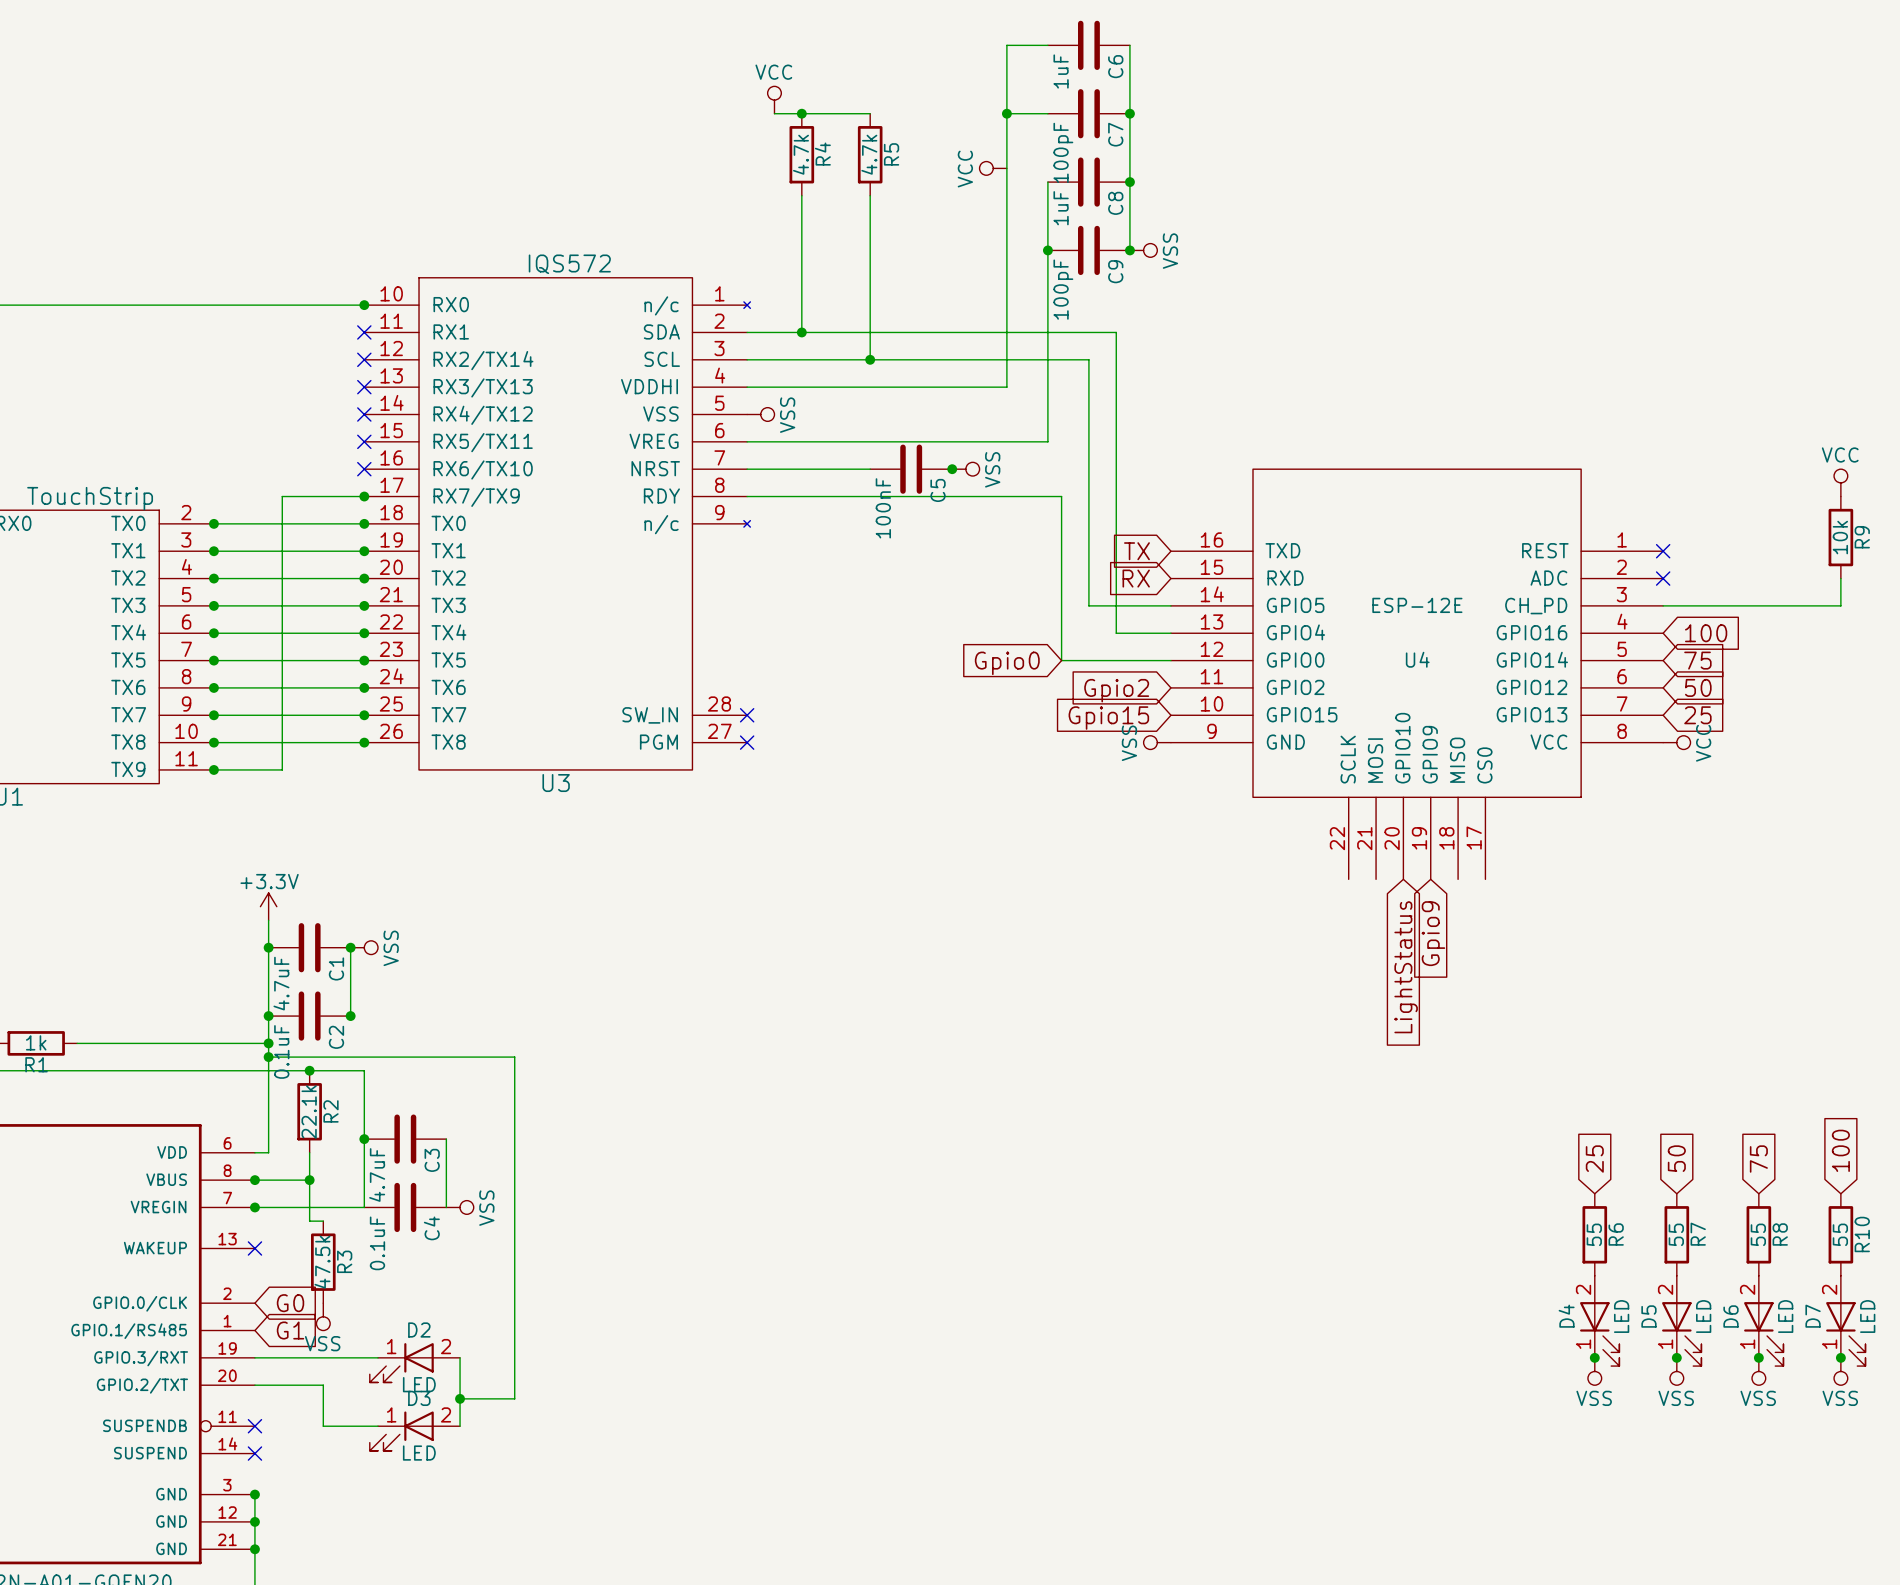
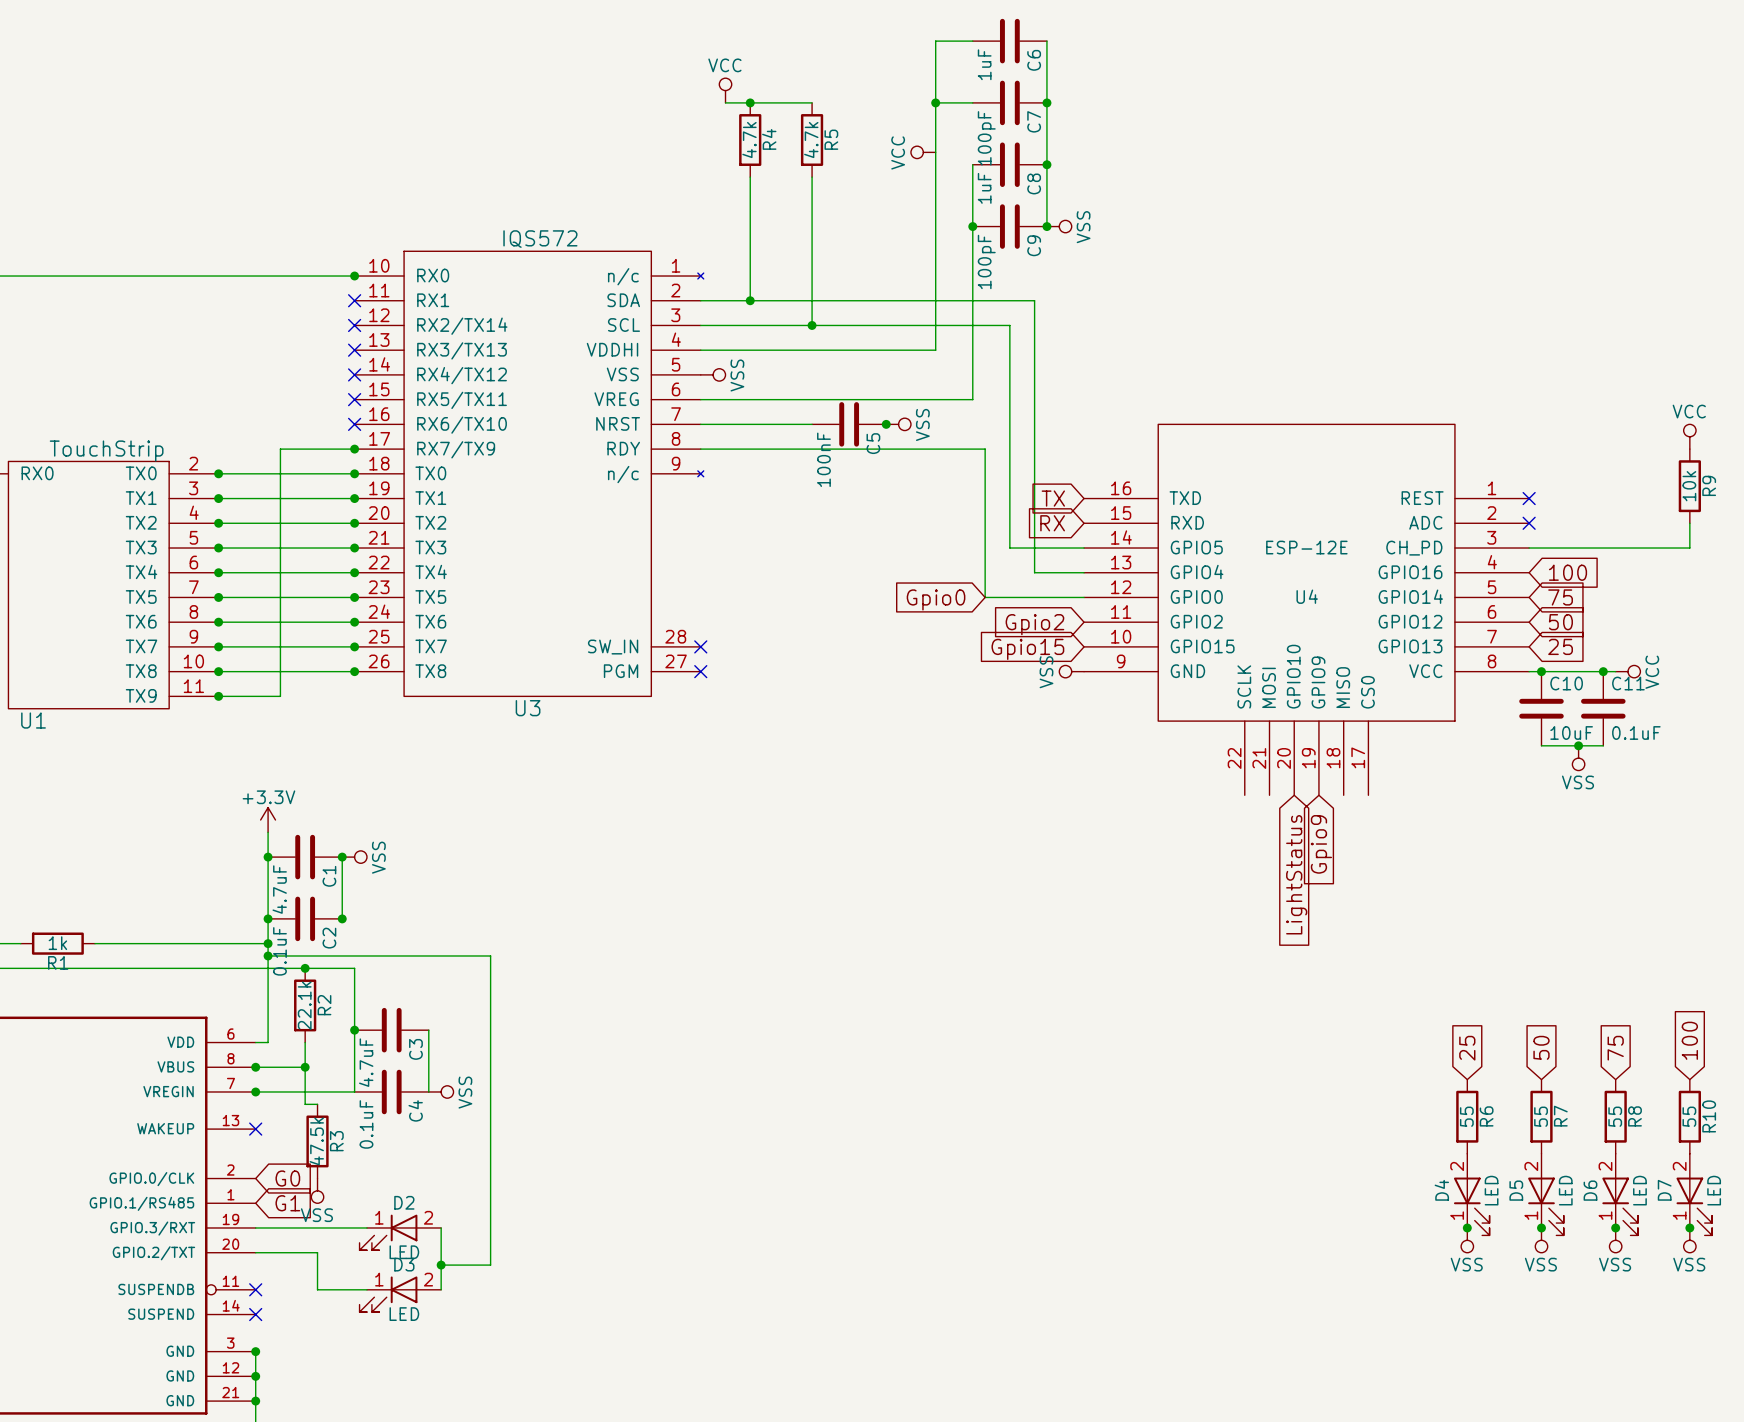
wire: none -> (1529, 671) (1615, 671)
power symbol position: VCC (1676, 742) -> VCC (1628, 671)
junction: none -> (1541, 671)
junction: none -> (1603, 671)
C10: none -> 10uF (1541, 708)
C11: none -> 0.1uF (1603, 708)
wire: none -> (1541, 745) (1603, 745)
junction: none -> (1578, 745)
power symbol: none -> VSS (1578, 758)

